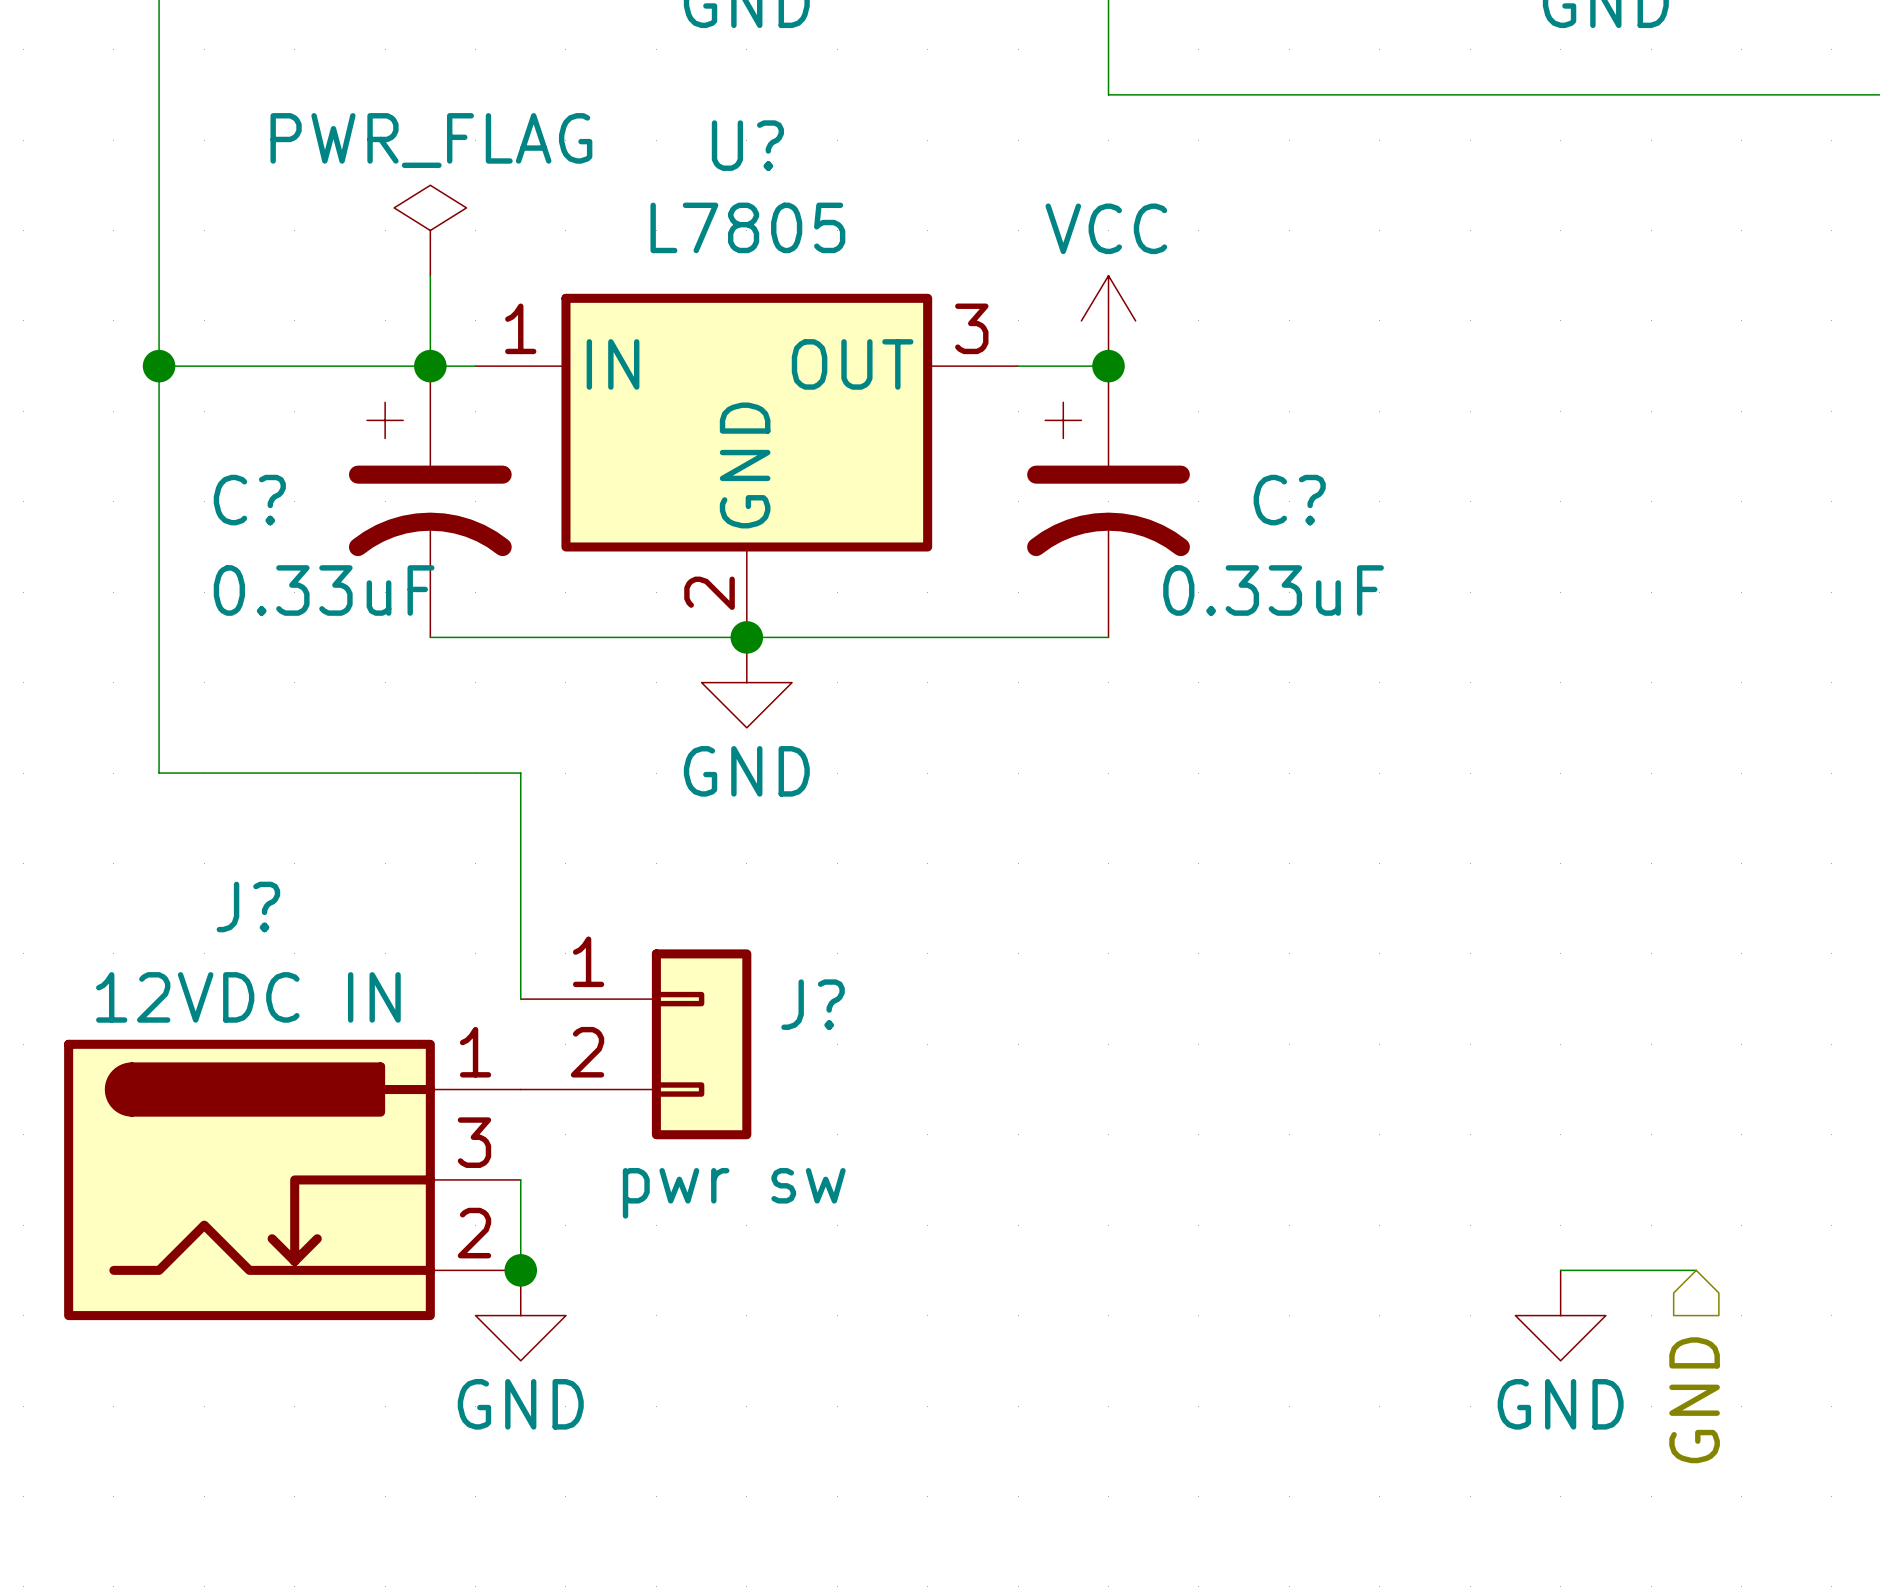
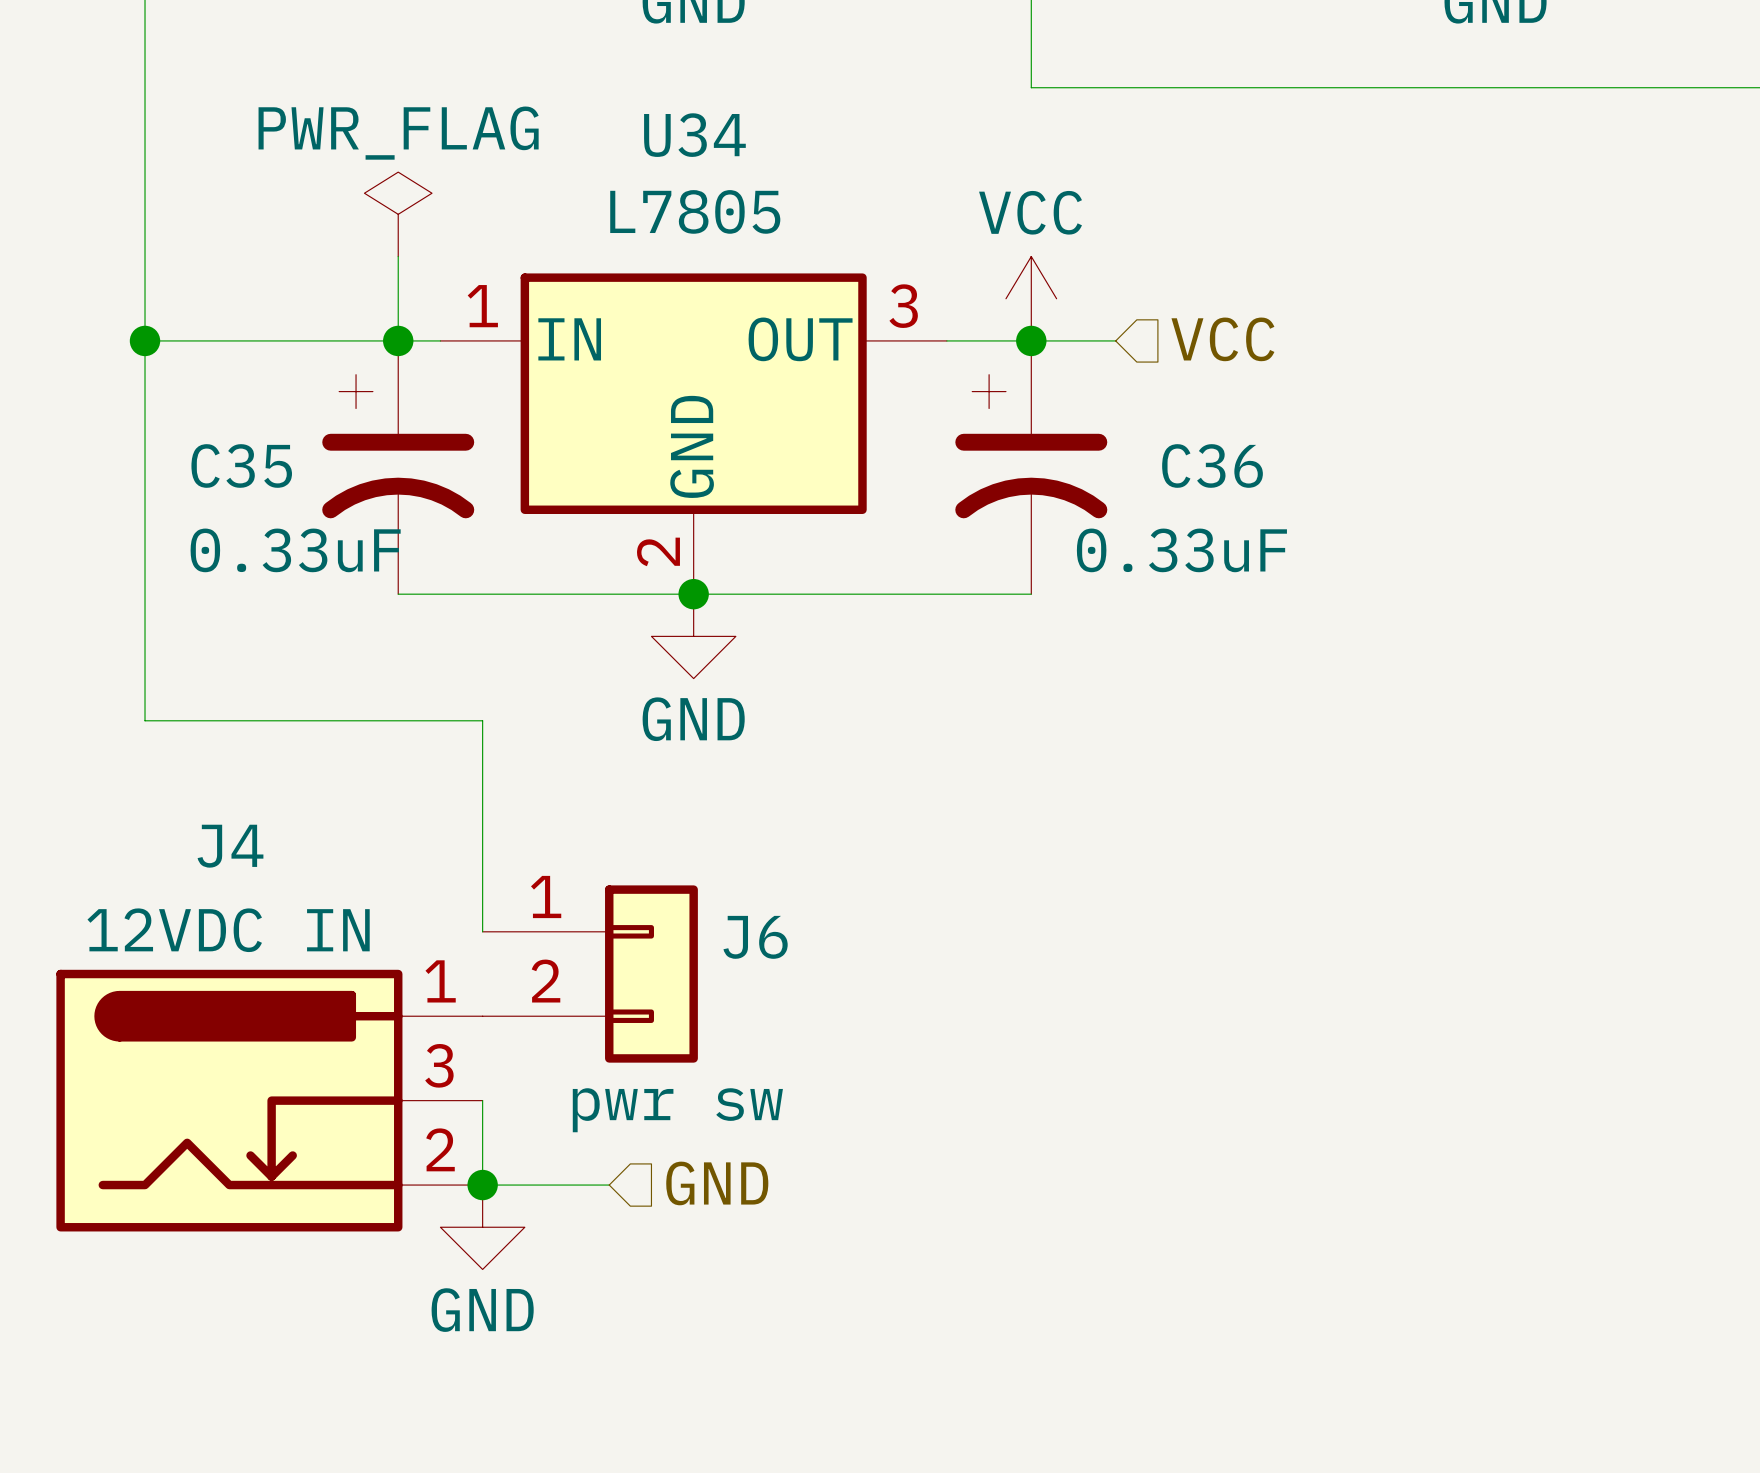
U? name: U? (747, 145) -> U34 (694, 135)
hierarchical label: none -> VCC (1222, 339)
wire: none -> (1031, 340) (1115, 340)
C? name: C? (249, 500) -> C35 (241, 465)
C? name: C? (1289, 500) -> C36 (1212, 465)
J? name: J? (248, 906) -> J4 (230, 846)
J? name: J? (813, 1004) -> J6 (755, 937)
hierarchical label: none -> GND (717, 1183)
wire: none -> (482, 1185) (609, 1185)
wire: (1560, 1270) (1696, 1270) -> none
power symbol: GND (1560, 1315) -> none
hierarchical label: GND (1694, 1400) -> none

